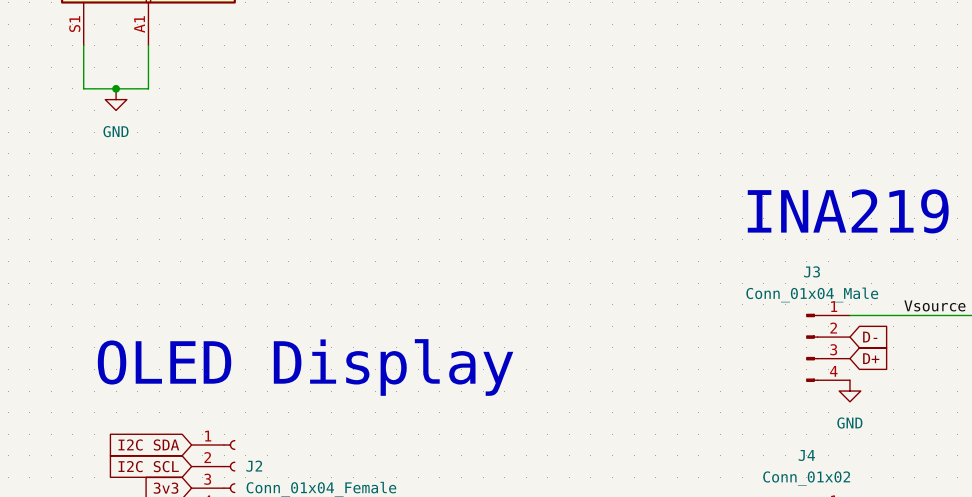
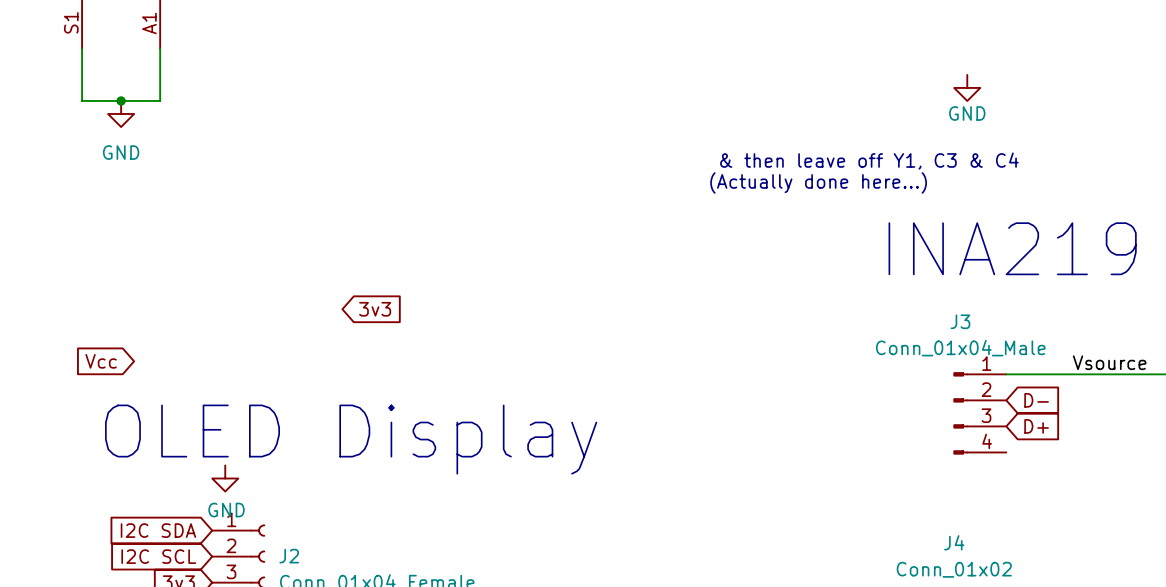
power symbol: none -> GND (967, 87)
text: none -> & then leave off Y1, C3 & C4 (869, 161)
text: none -> (Actually done here...) (818, 182)
global label: none -> 3v3 (375, 309)
global label: none -> Vcc (101, 361)
power symbol: GND (849, 391) -> none
power symbol: none -> GND (225, 478)

